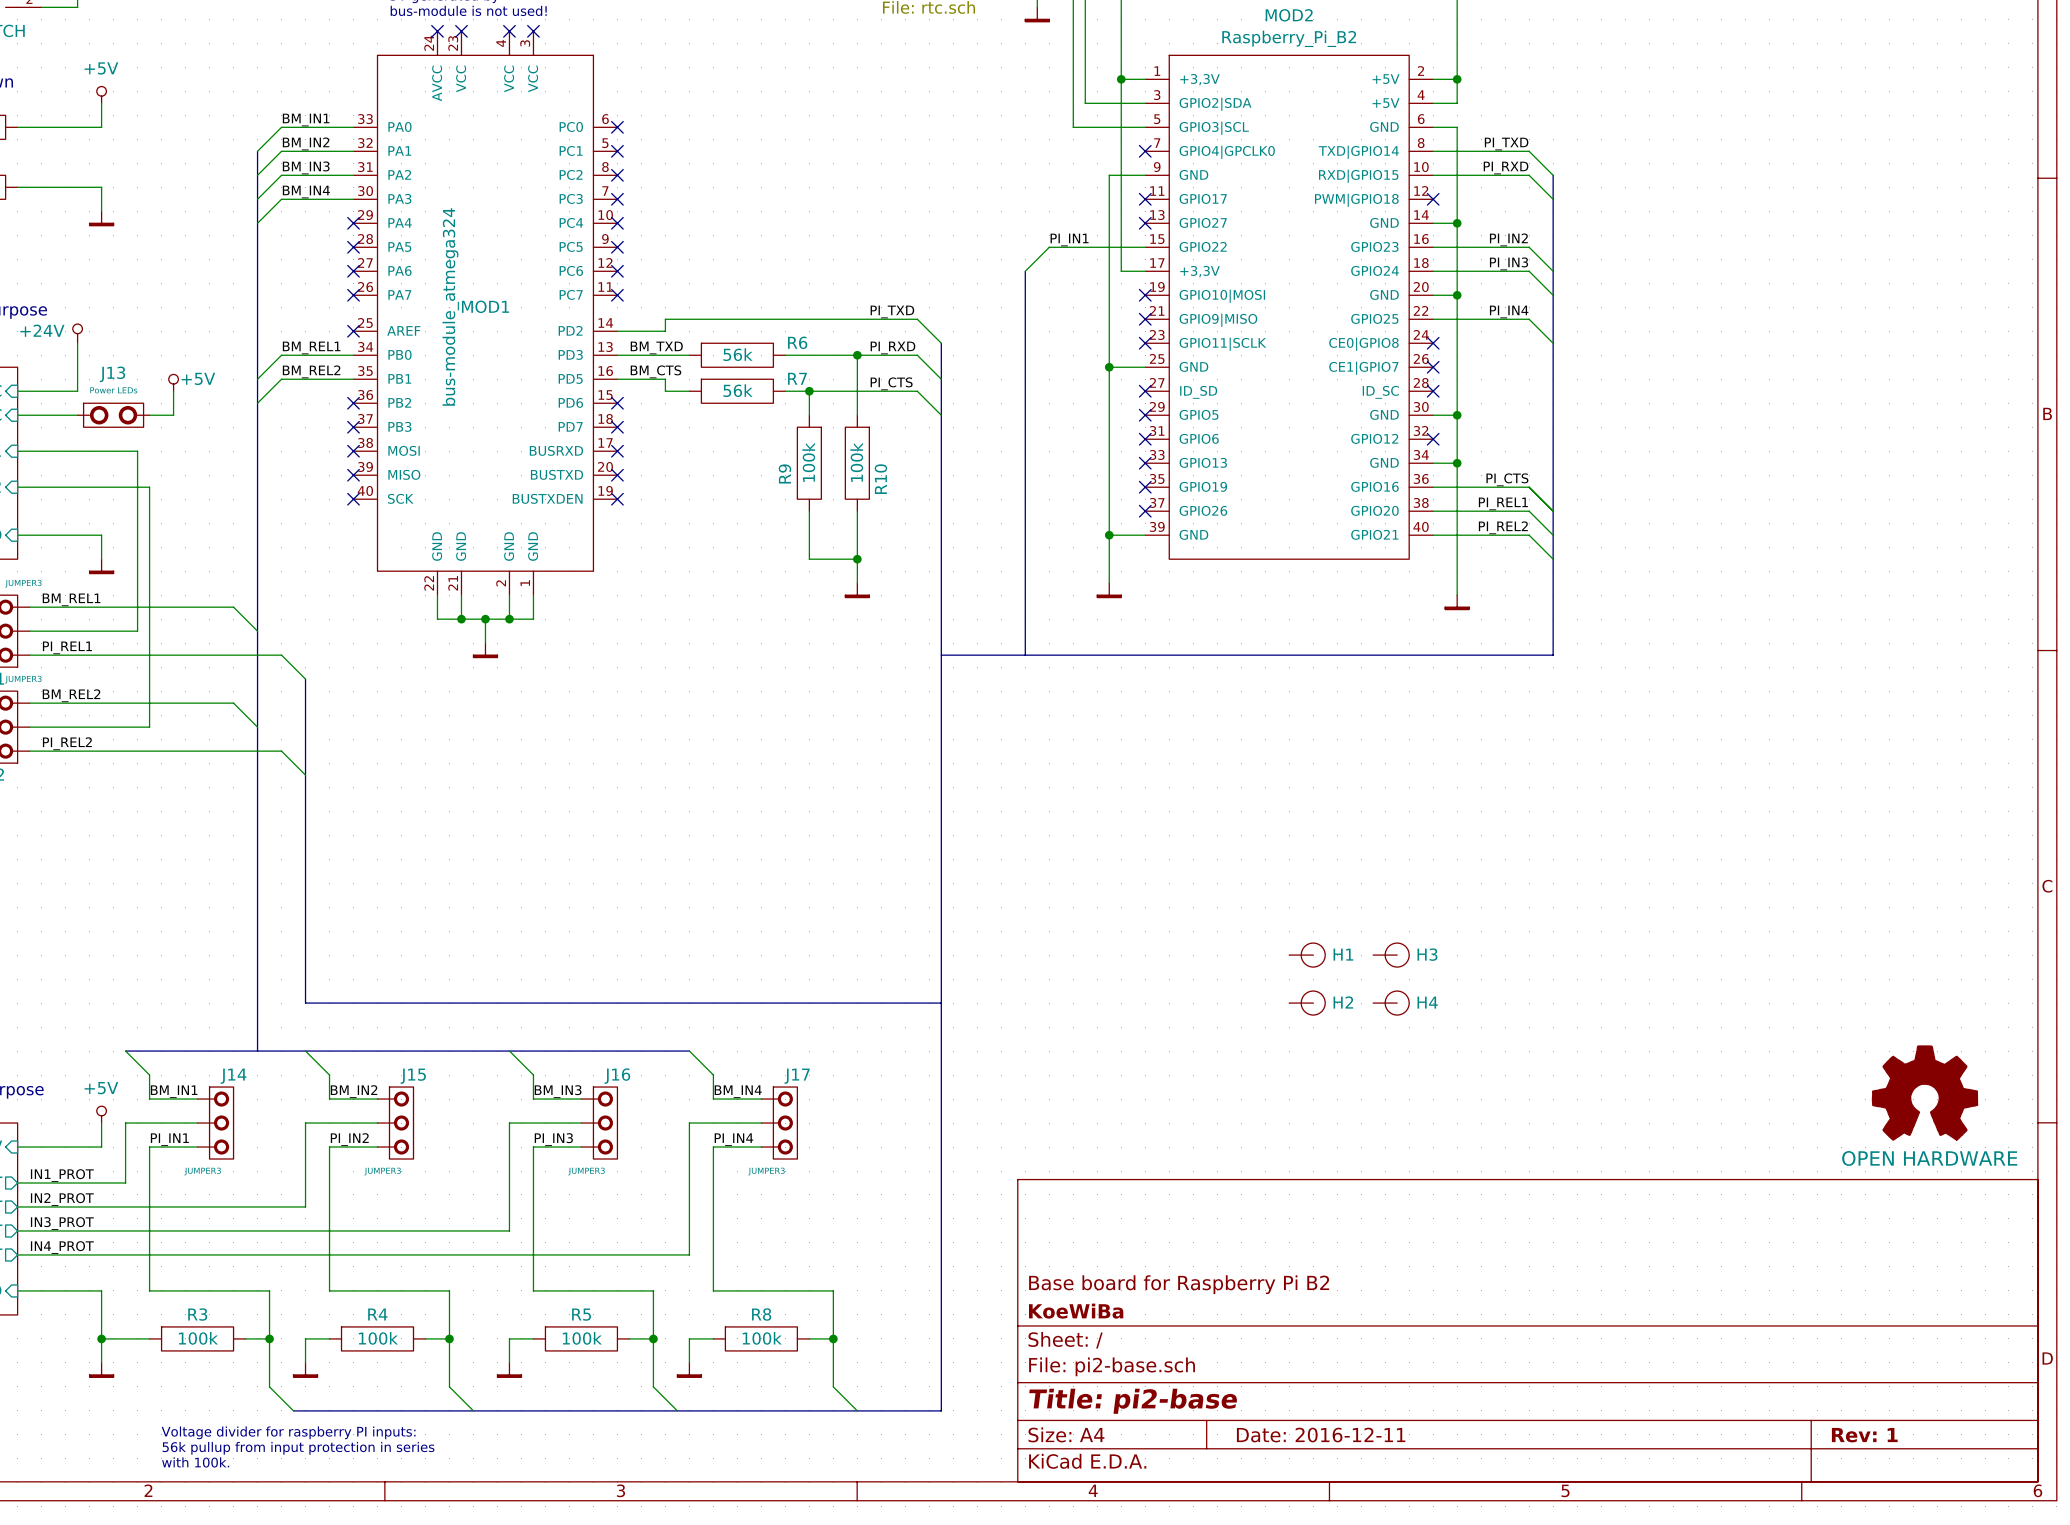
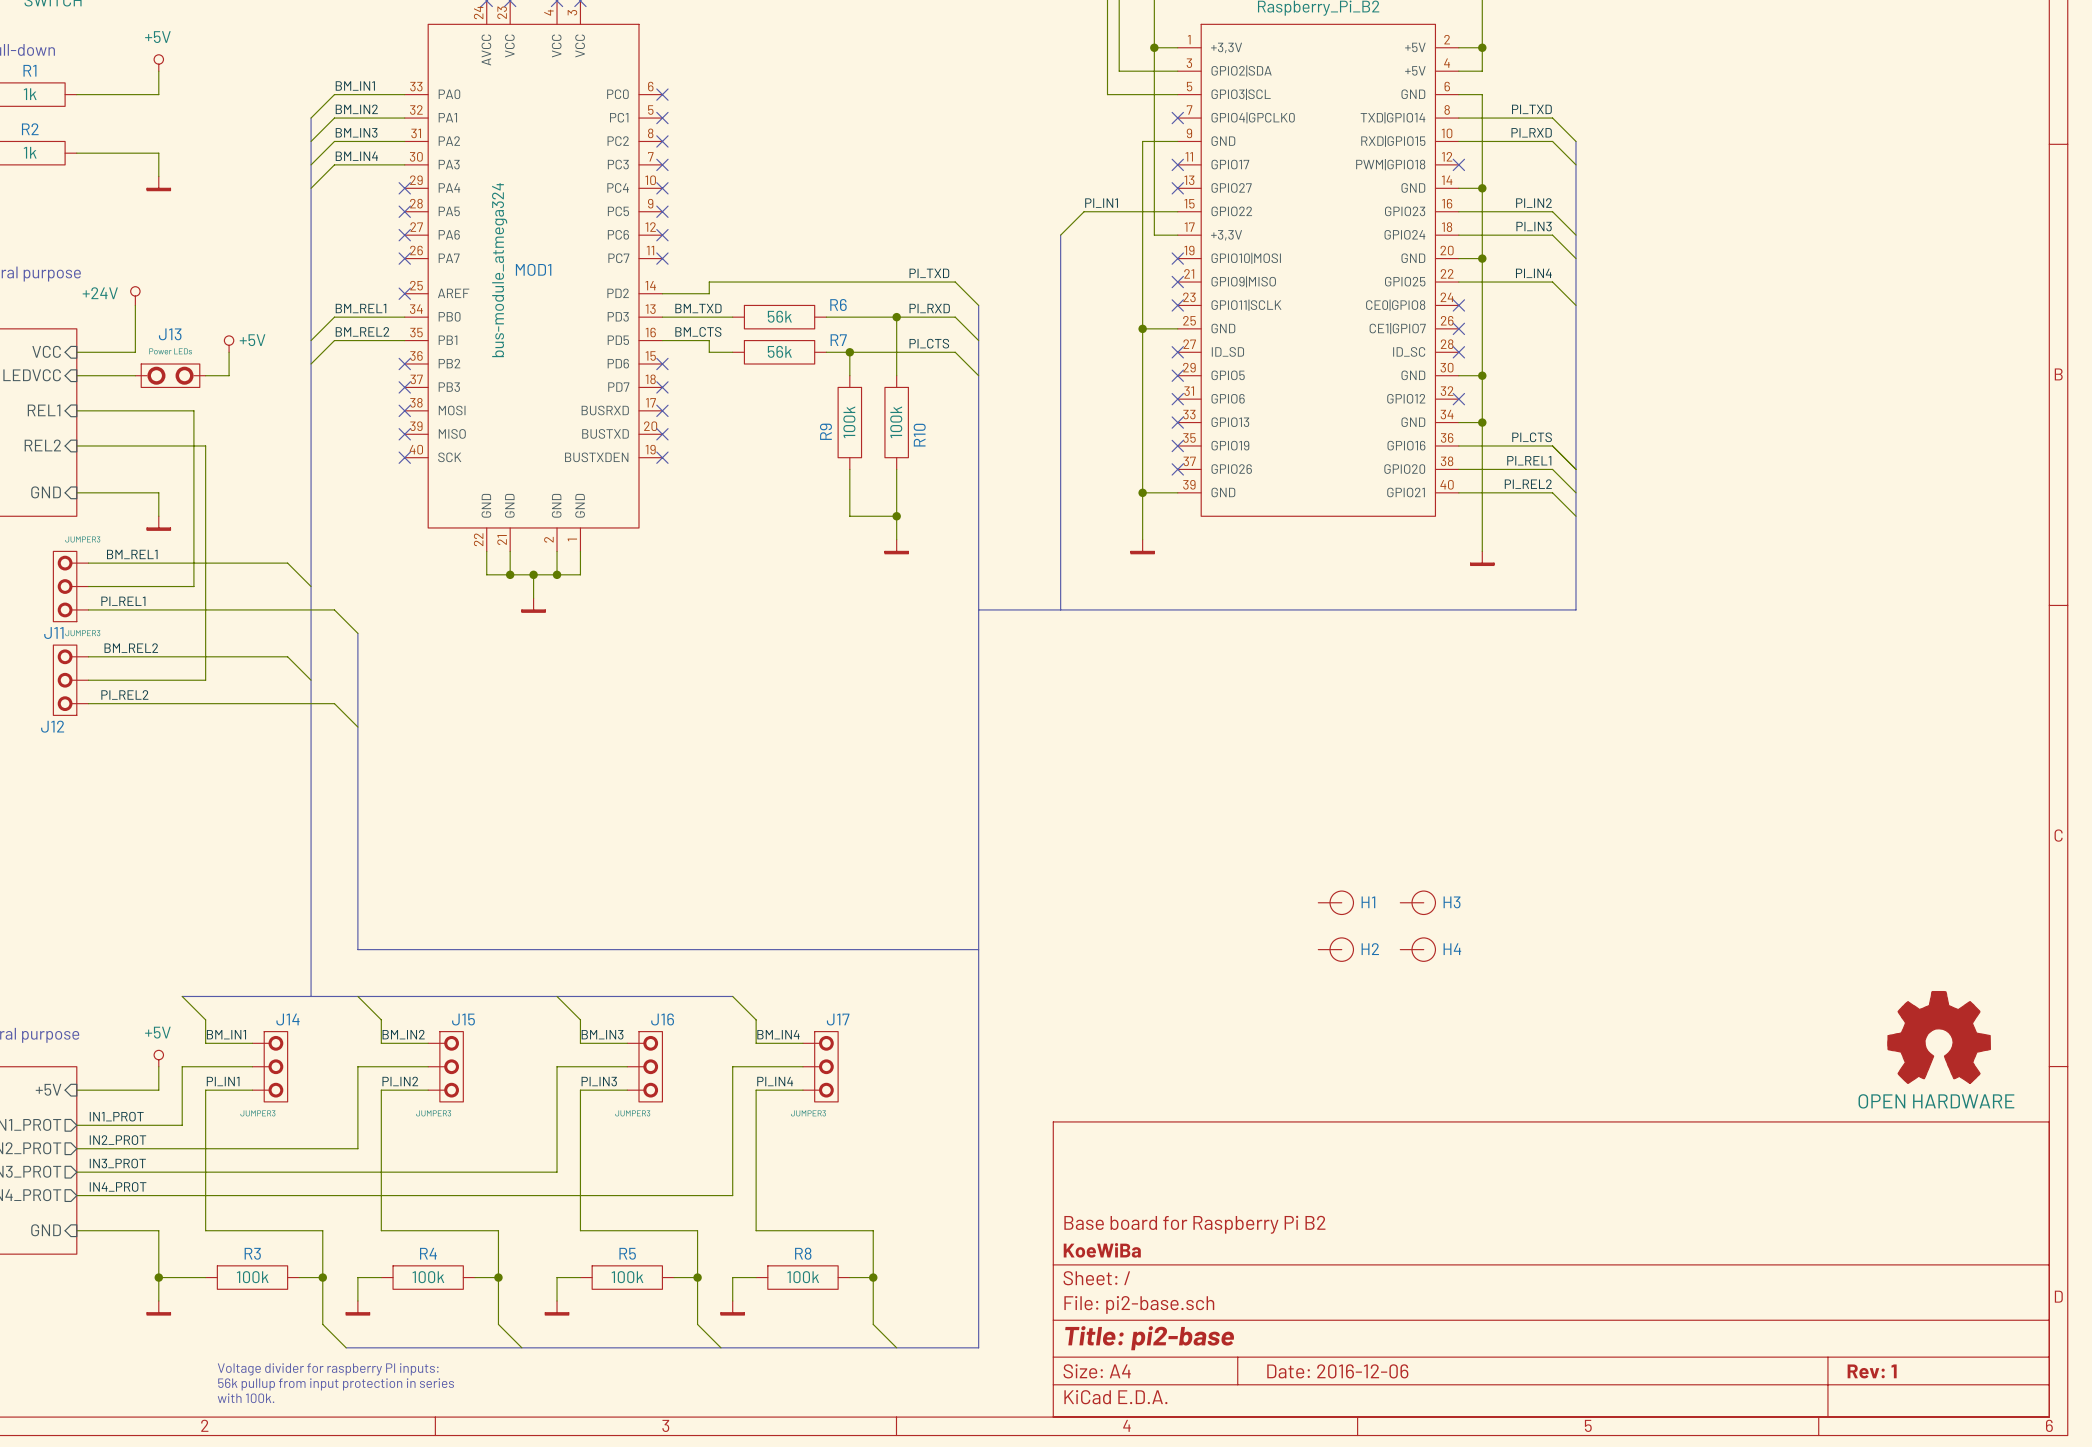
title block: Date: 2016-12-11 (1321, 1435) -> Date: 2016-12-06 (1337, 1371)

